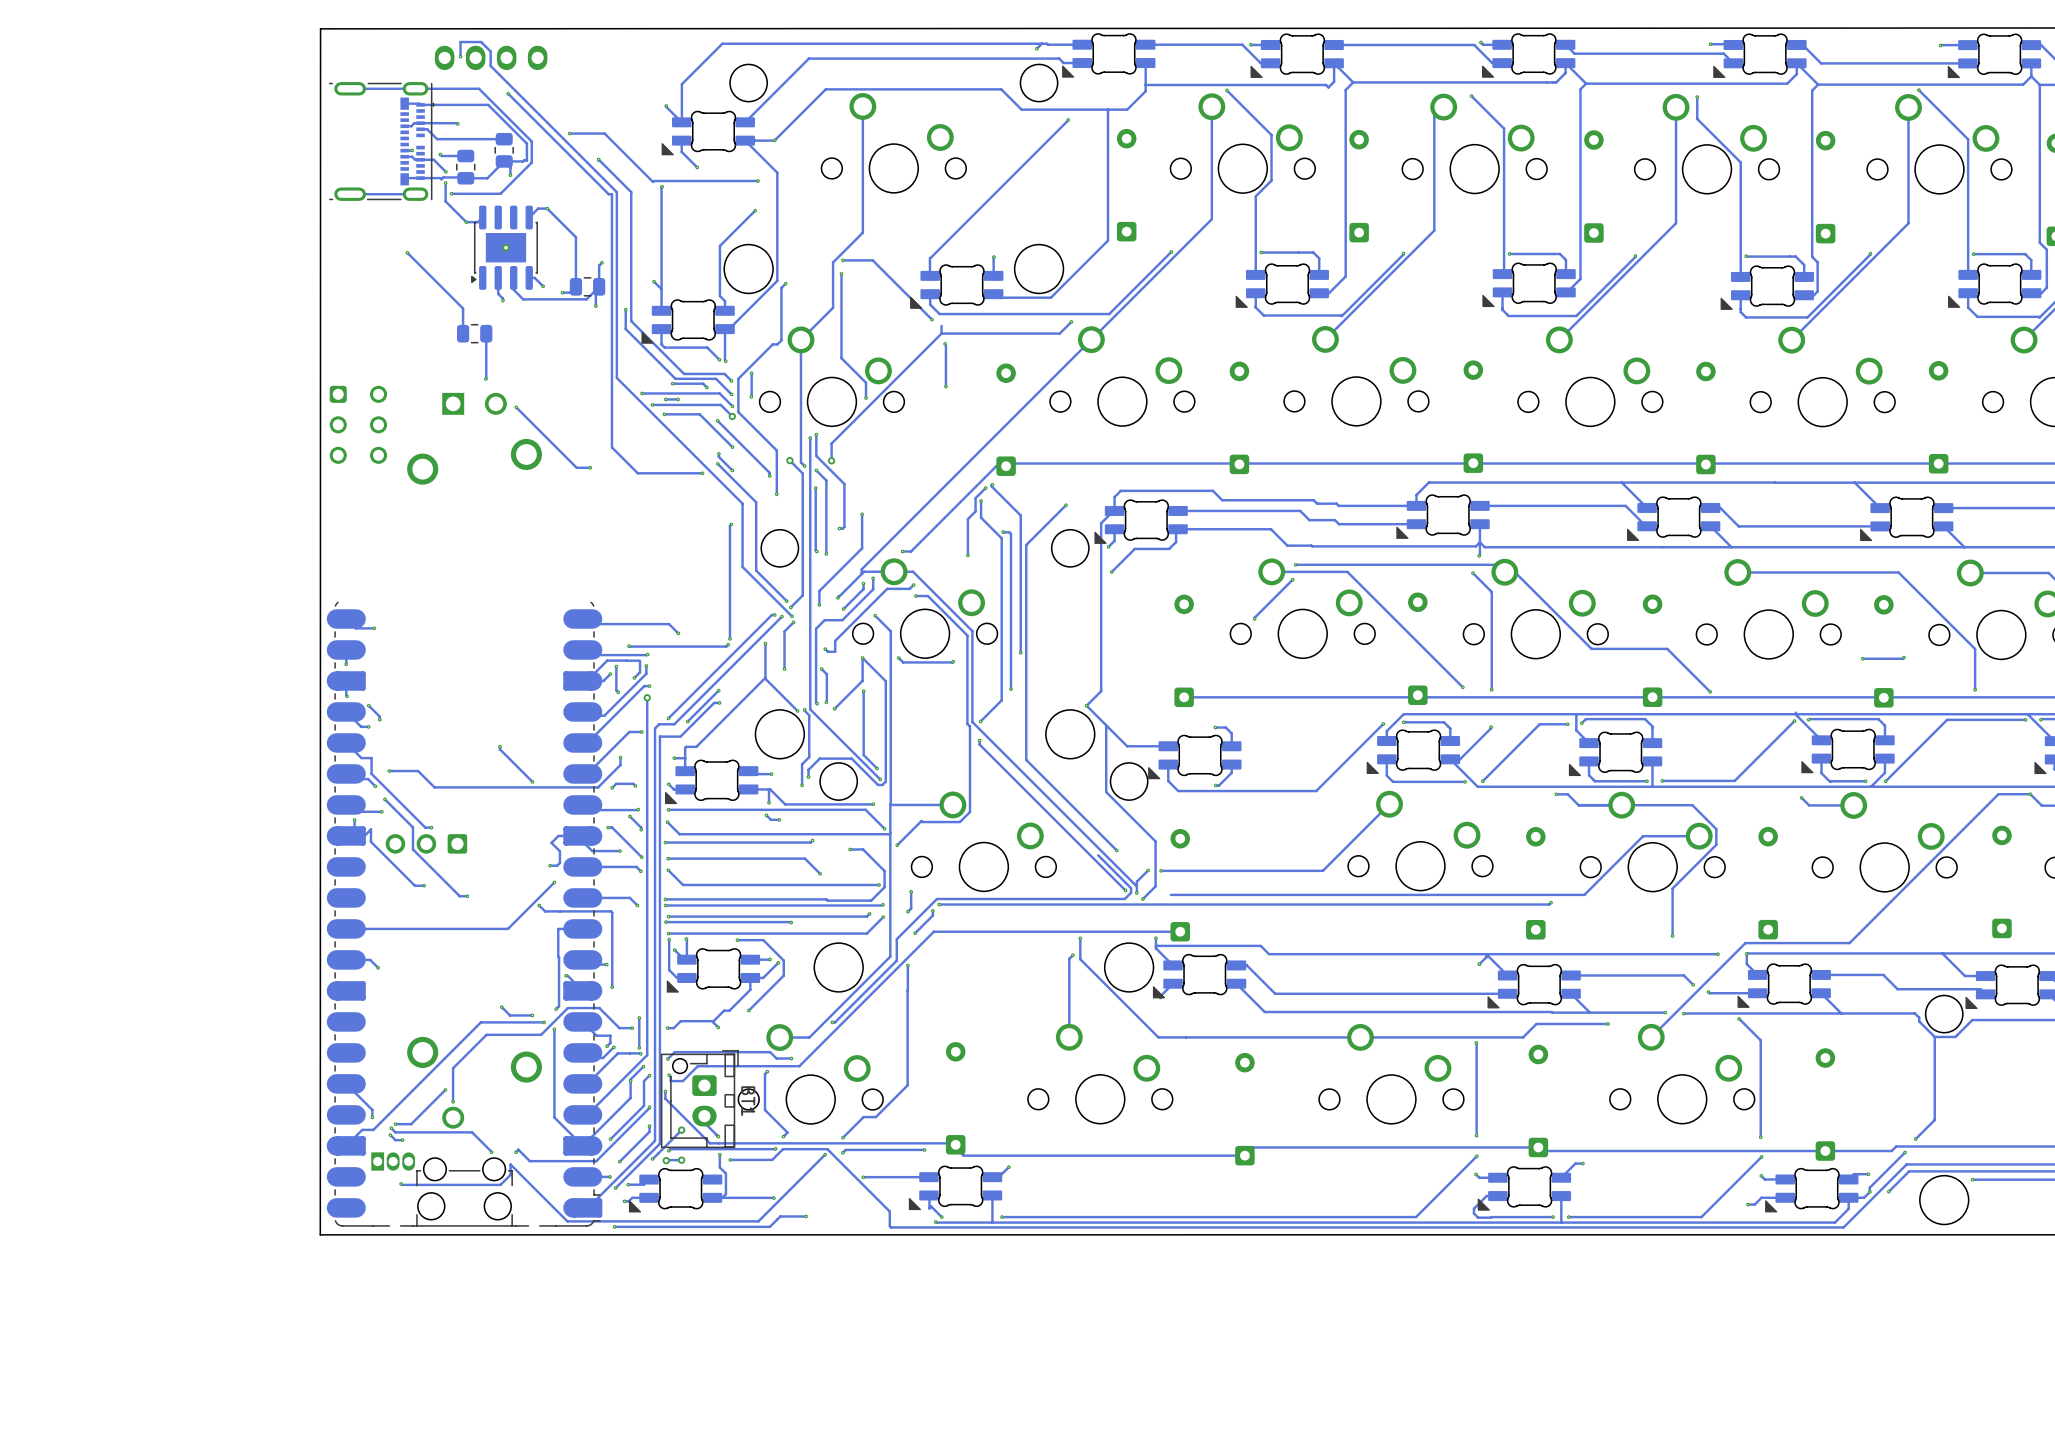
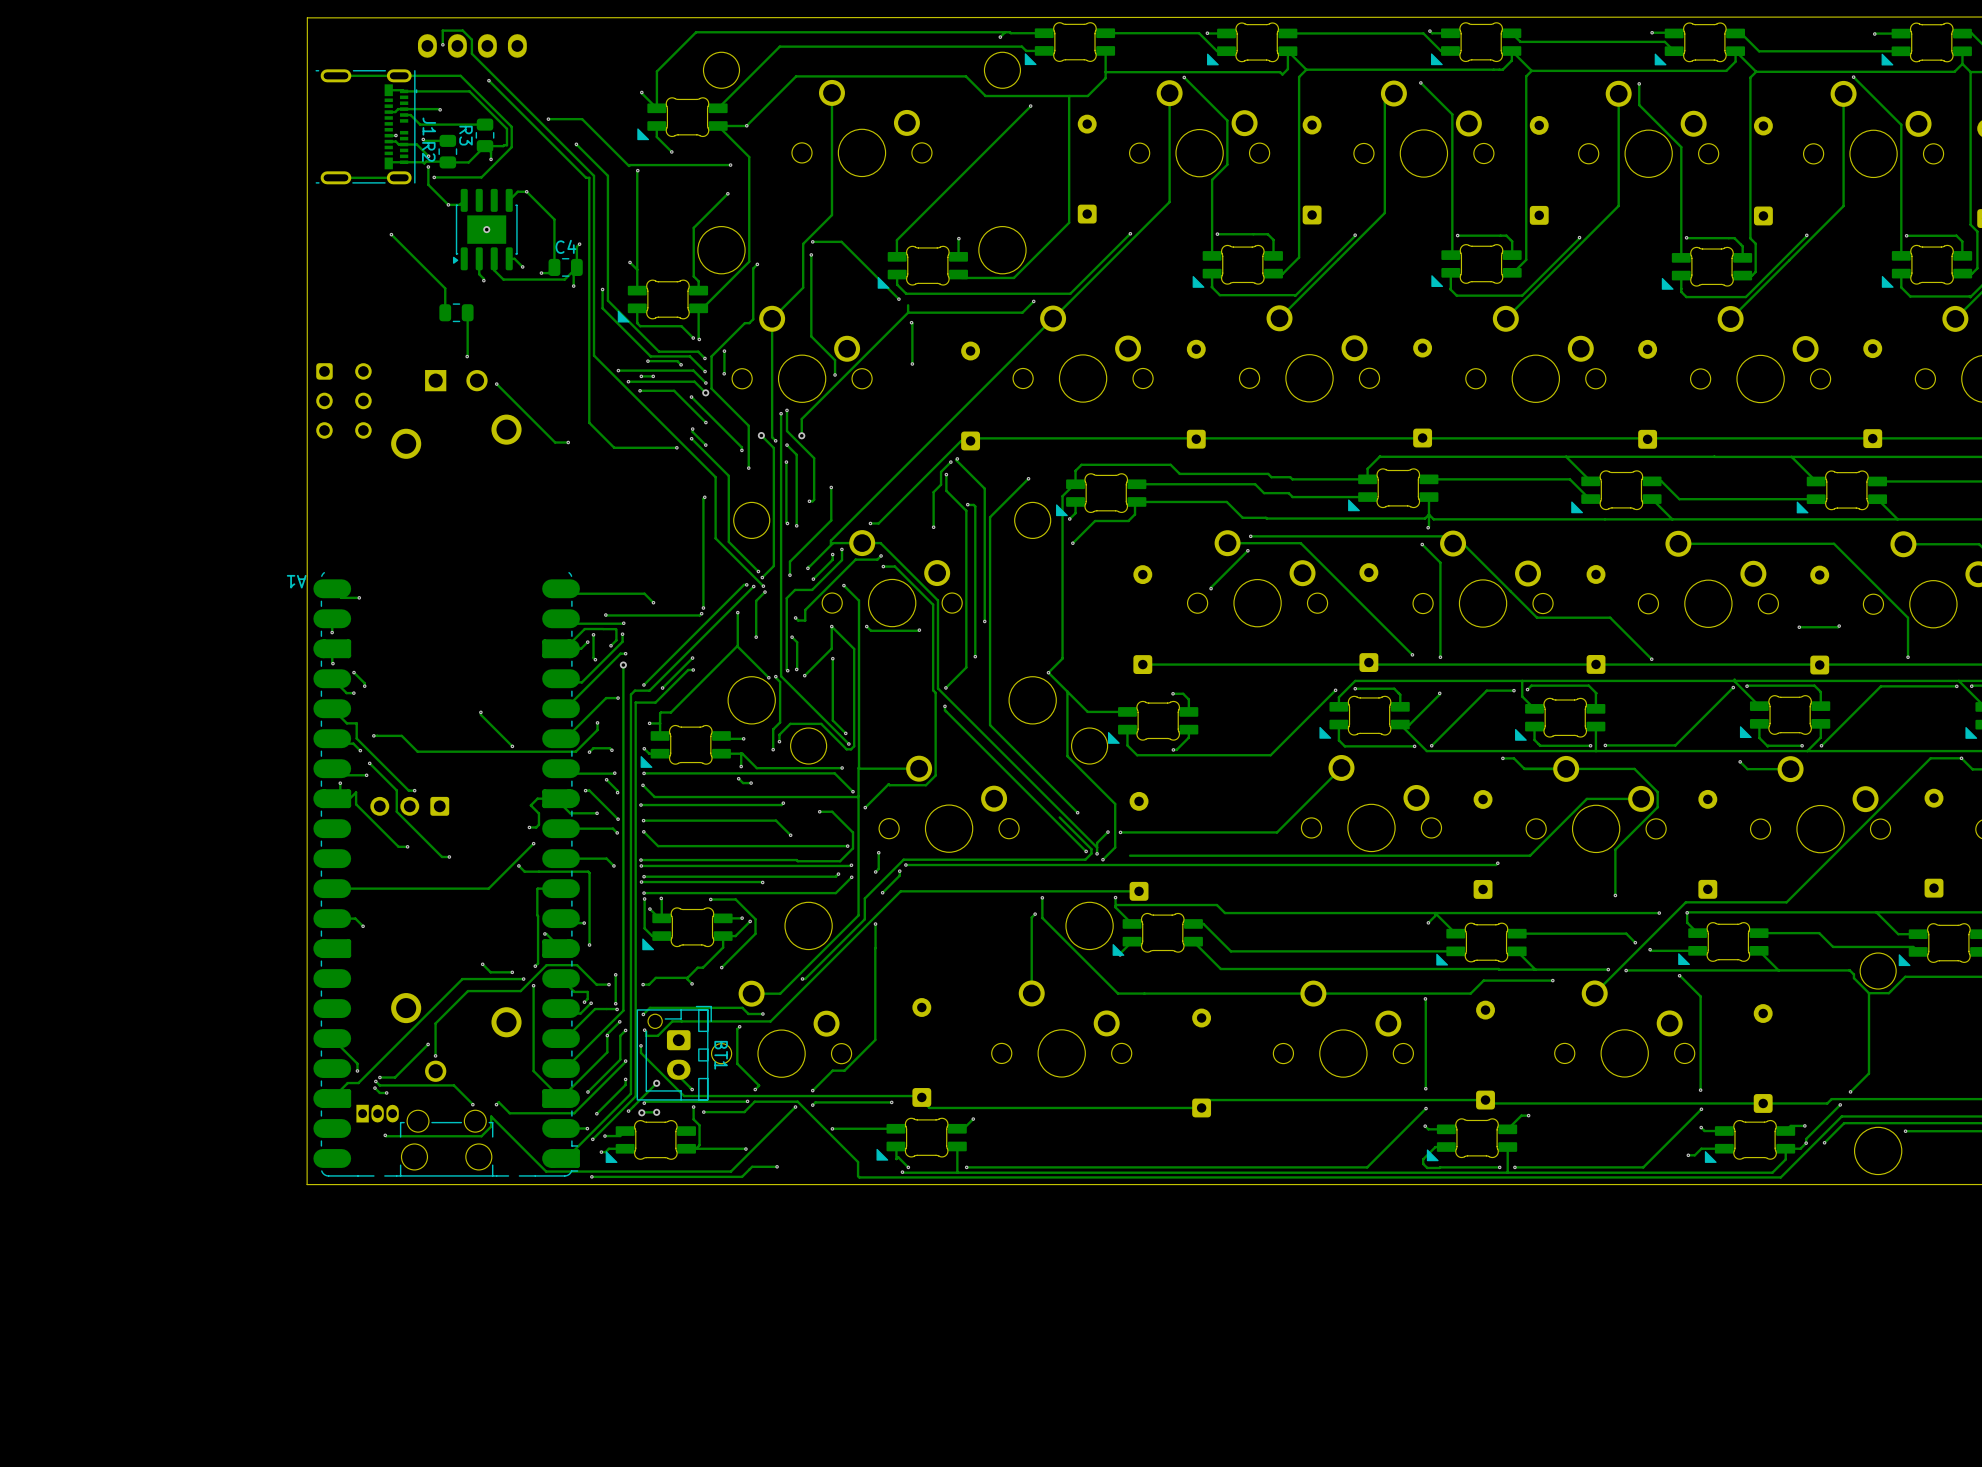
J1 name: none -> J1 (429, 126)
R3 name: none -> R3 (465, 135)
R2 name: none -> R2 (428, 151)
C4 name: none -> C4 (565, 246)
A1 name: none -> A1 (296, 581)

